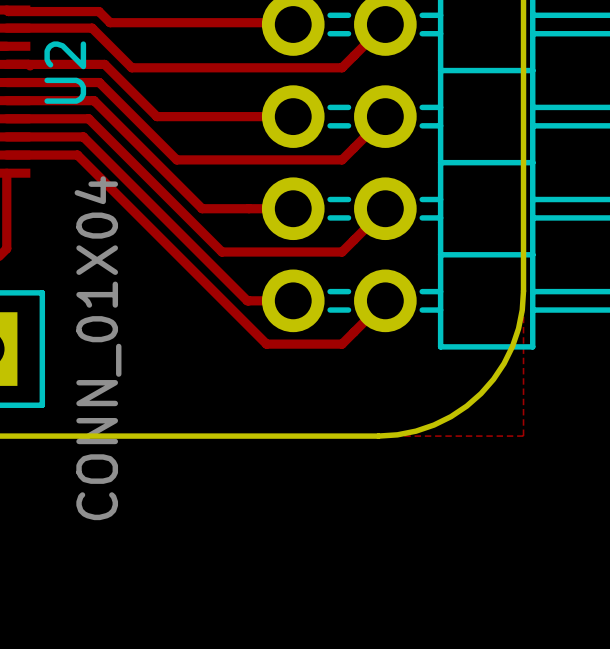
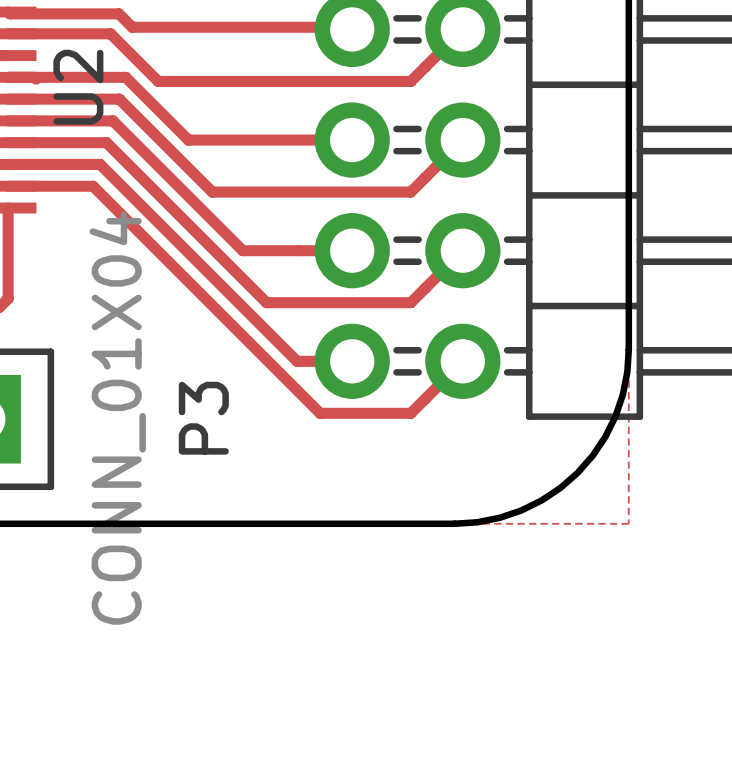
P3 name: none -> P3 (203, 418)

